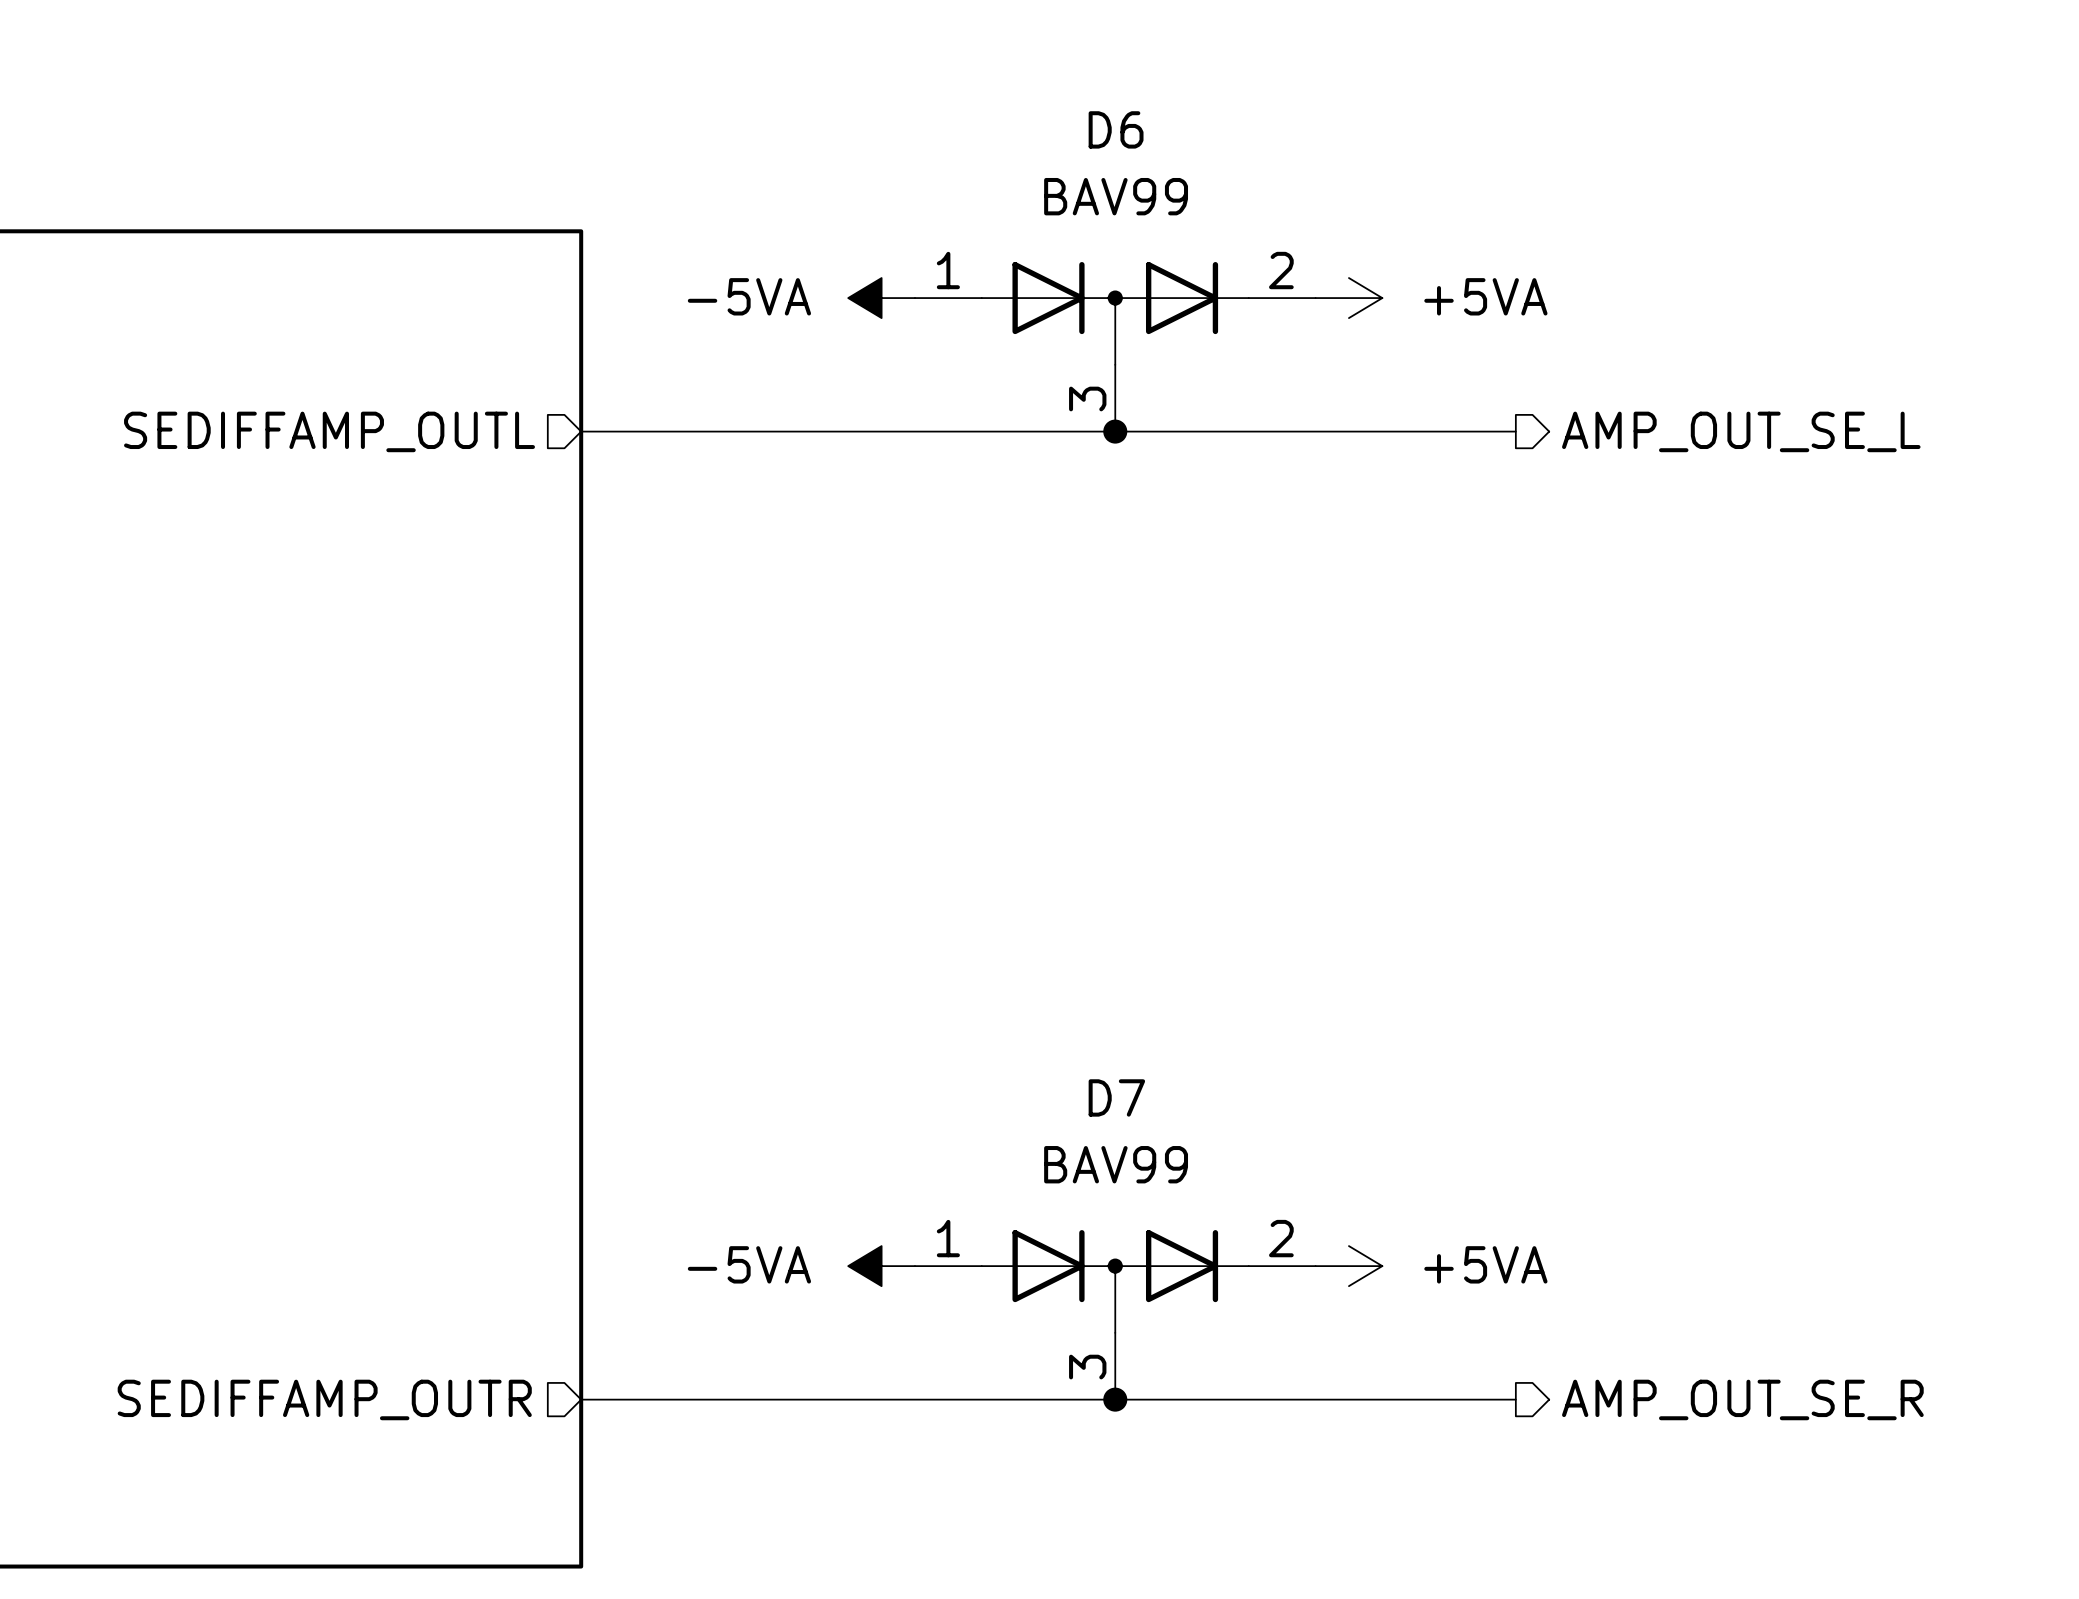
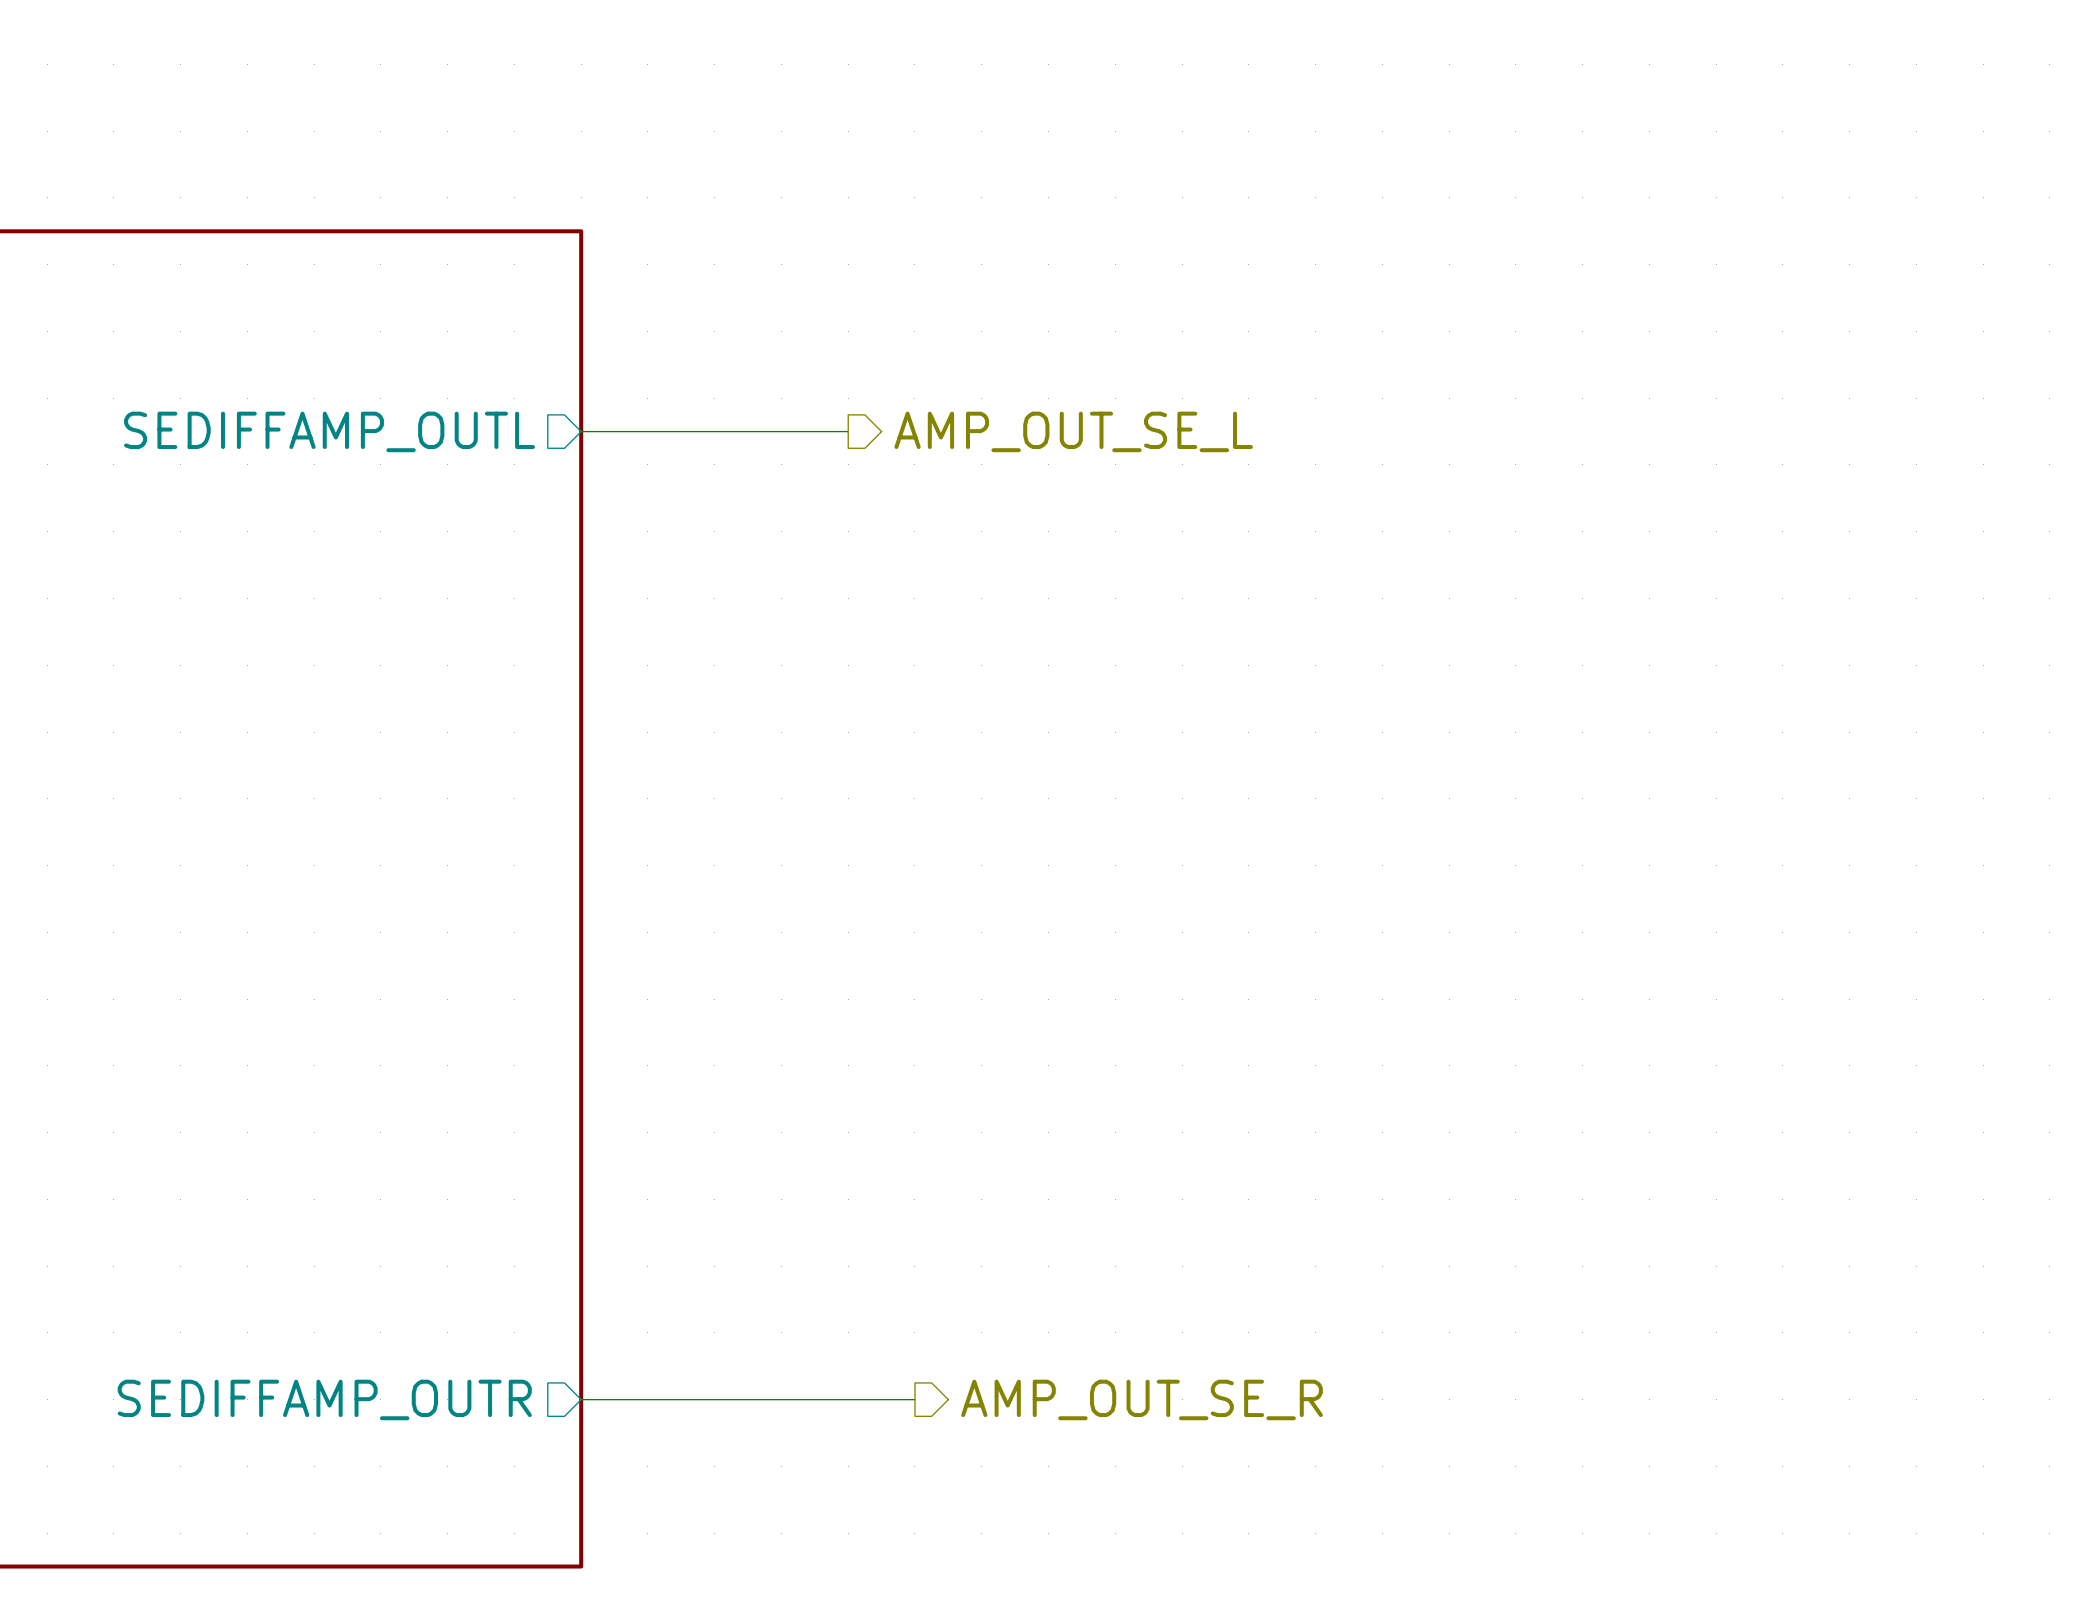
power symbol: -5VA (881, 298) -> none
power symbol: +5VA (1348, 298) -> none
D6: BAV99 (1115, 346) -> none
wire: (848, 431) (1515, 431) -> none
hierarchical label: none -> AMP_OUT_SE_L (1073, 431)
junction: (1115, 431) -> none
hierarchical label: AMP_OUT_SE_L (1741, 431) -> none
power symbol: -5VA (881, 1266) -> none
power symbol: +5VA (1348, 1266) -> none
D7: BAV99 (1115, 1314) -> none
wire: (914, 1399) (1515, 1399) -> none
junction: (1115, 1399) -> none
hierarchical label position: AMP_OUT_SE_R (1742, 1399) -> AMP_OUT_SE_R (1142, 1399)

